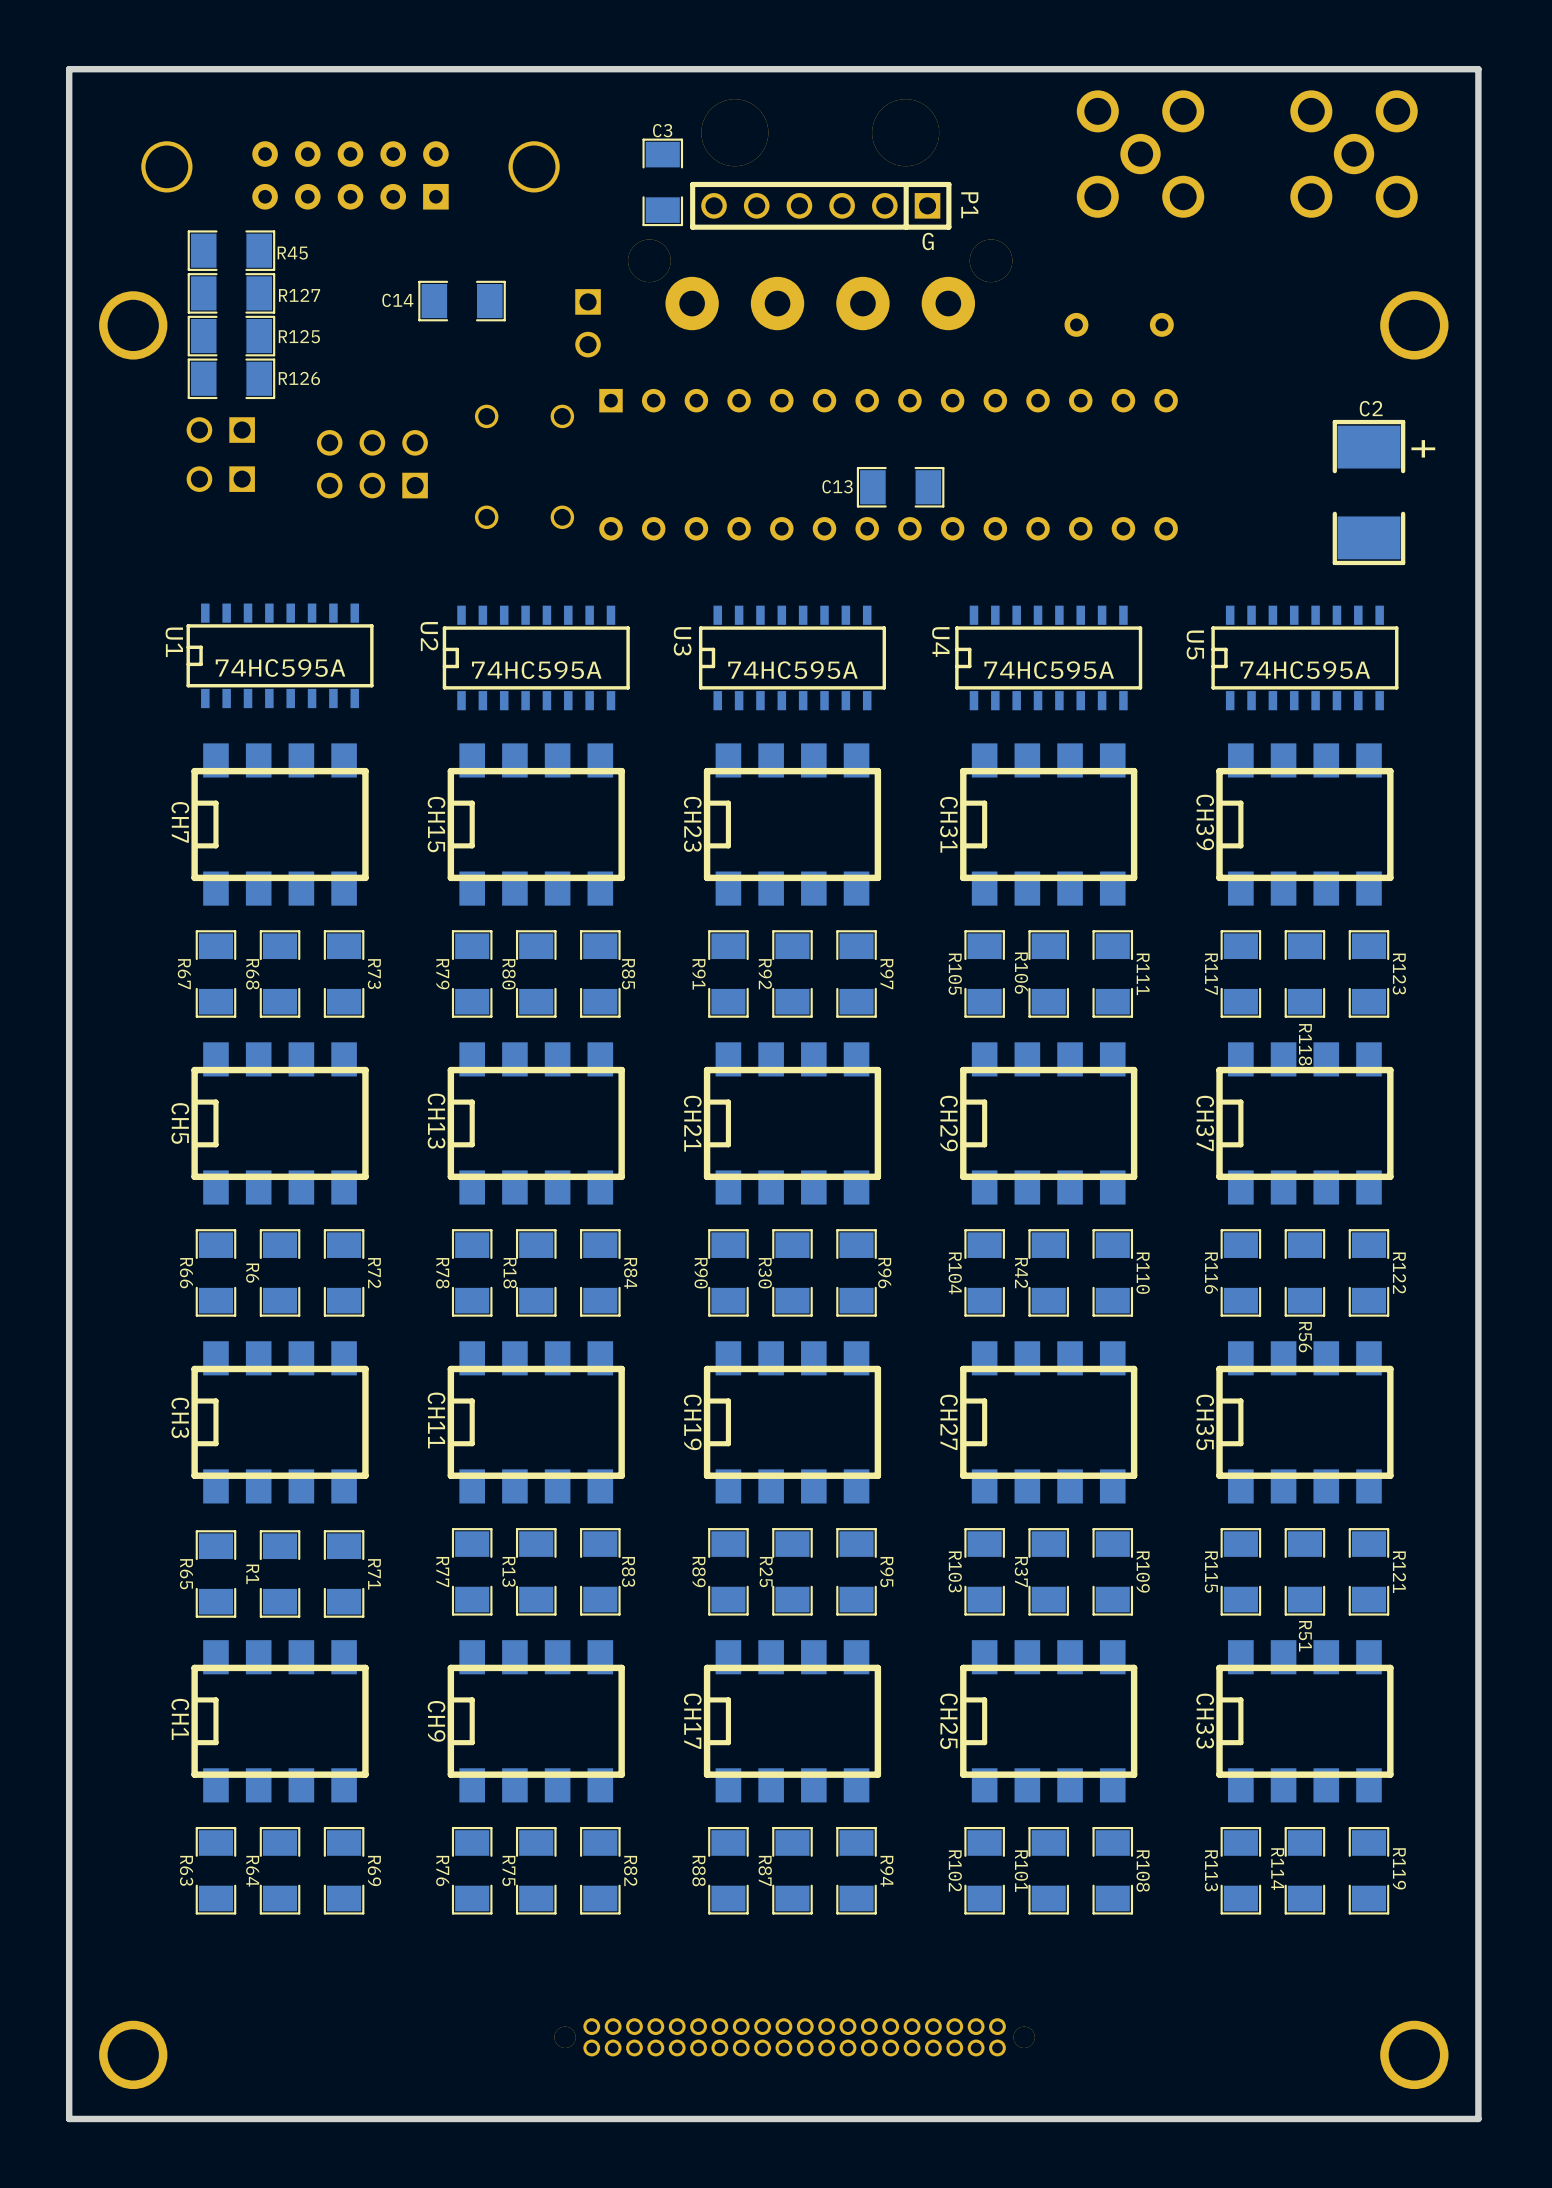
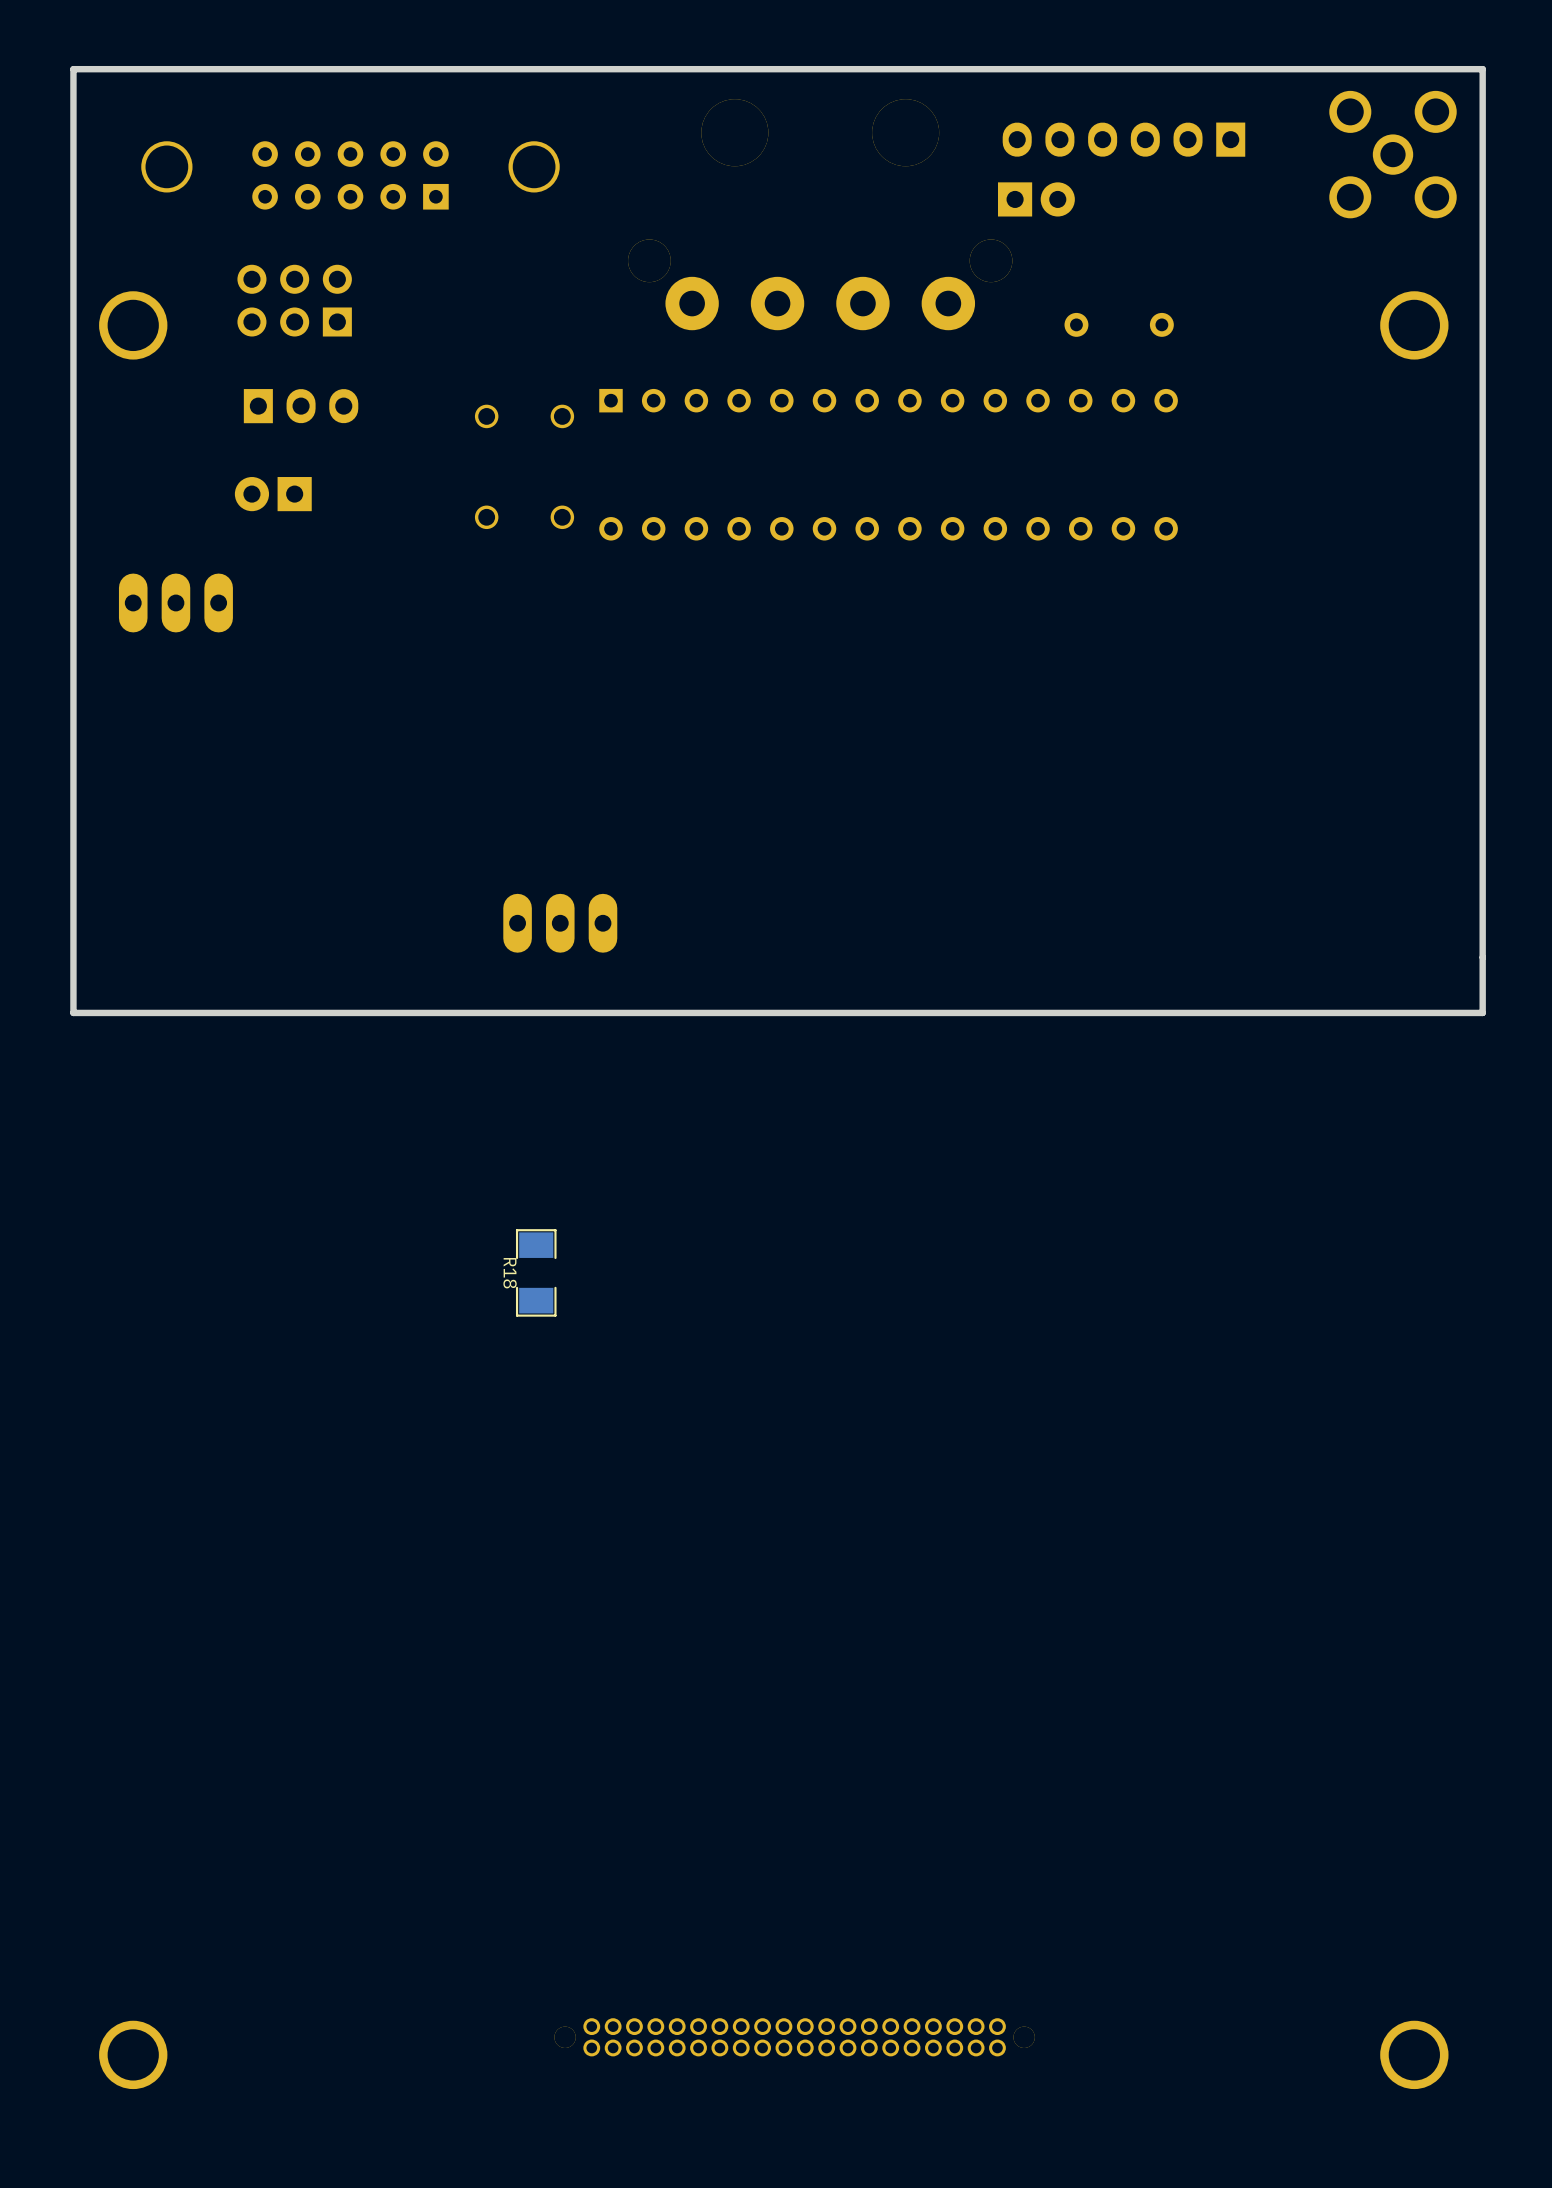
board edge: (1478, 69) (1478, 2118) (69, 2118) (69, 69) (73, 69) -> (1478, 69) (1482, 69) (1482, 1012) (73, 1012) (73, 69)
part: none -> (1123, 139)
part: (1140, 154) -> none
part position: (1354, 154) -> (1393, 154)
C3: (662, 182) -> none
part: none -> (1036, 199)
P1: (820, 205) -> none
text: G (928, 241) -> none
R45: (231, 250) -> none
R127: (231, 293) -> none
part: none -> (294, 300)
C14: (462, 301) -> none
part: (588, 323) -> none
R125: (231, 336) -> none
R126: (231, 378) -> none
part: none -> (301, 406)
part: (220, 430) -> none
text: + (1423, 448) -> none
part: (372, 464) -> none
part: (220, 479) -> none
C13: (900, 487) -> none
C2: (1368, 492) -> none
part: none -> (273, 494)
part: none -> (175, 602)
U1: 74HC595A (280, 655) -> none
U2: 74HC595A (536, 657) -> none
U3: 74HC595A (792, 657) -> none
U4: 74HC595A (1048, 657) -> none
U5: 74HC595A (1304, 657) -> none
CH7: (280, 824) -> none
CH15: (536, 824) -> none
CH23: (792, 824) -> none
CH31: (1048, 824) -> none
CH39: (1304, 824) -> none
part: none -> (560, 923)
R67: (215, 973) -> none
R68: (280, 973) -> none
R73: (344, 973) -> none
R79: (472, 973) -> none
R80: (536, 973) -> none
R85: (600, 973) -> none
R91: (728, 973) -> none
R92: (792, 973) -> none
R97: (856, 973) -> none
R105: (984, 973) -> none
R106: (1048, 973) -> none
R111: (1112, 973) -> none
R117: (1240, 973) -> none
R118: (1304, 973) -> none
R123: (1368, 973) -> none
CH5: (280, 1123) -> none
CH13: (536, 1123) -> none
CH21: (792, 1123) -> none
CH29: (1048, 1123) -> none
CH37: (1304, 1123) -> none
R66: (215, 1272) -> none
R6: (280, 1272) -> none
R72: (344, 1272) -> none
R78: (472, 1272) -> none
R84: (600, 1272) -> none
R90: (728, 1272) -> none
R30: (792, 1272) -> none
R96: (856, 1272) -> none
R104: (984, 1272) -> none
R42: (1048, 1272) -> none
R110: (1112, 1272) -> none
R116: (1240, 1272) -> none
R56: (1304, 1272) -> none
R122: (1368, 1272) -> none
CH3: (280, 1422) -> none
CH11: (536, 1422) -> none
CH19: (792, 1422) -> none
CH27: (1048, 1422) -> none
CH35: (1304, 1422) -> none
R77: (472, 1571) -> none
R13: (536, 1571) -> none
R83: (600, 1571) -> none
R89: (728, 1571) -> none
R25: (792, 1571) -> none
R95: (856, 1571) -> none
R103: (984, 1571) -> none
R37: (1048, 1571) -> none
R109: (1112, 1571) -> none
R115: (1240, 1571) -> none
R51: (1304, 1571) -> none
R121: (1368, 1571) -> none
R65: (215, 1573) -> none
R1: (280, 1573) -> none
R71: (344, 1573) -> none
CH1: (280, 1721) -> none
CH9: (536, 1721) -> none
CH17: (792, 1721) -> none
CH25: (1048, 1721) -> none
CH33: (1304, 1721) -> none
R63: (215, 1870) -> none
R64: (280, 1870) -> none
R69: (344, 1870) -> none
R76: (472, 1870) -> none
R75: (536, 1870) -> none
R82: (600, 1870) -> none
R88: (728, 1870) -> none
R87: (792, 1870) -> none
R94: (856, 1870) -> none
R102: (984, 1870) -> none
R101: (1048, 1870) -> none
R108: (1112, 1870) -> none
R113: (1240, 1870) -> none
R114: (1304, 1870) -> none
R119: (1368, 1870) -> none

